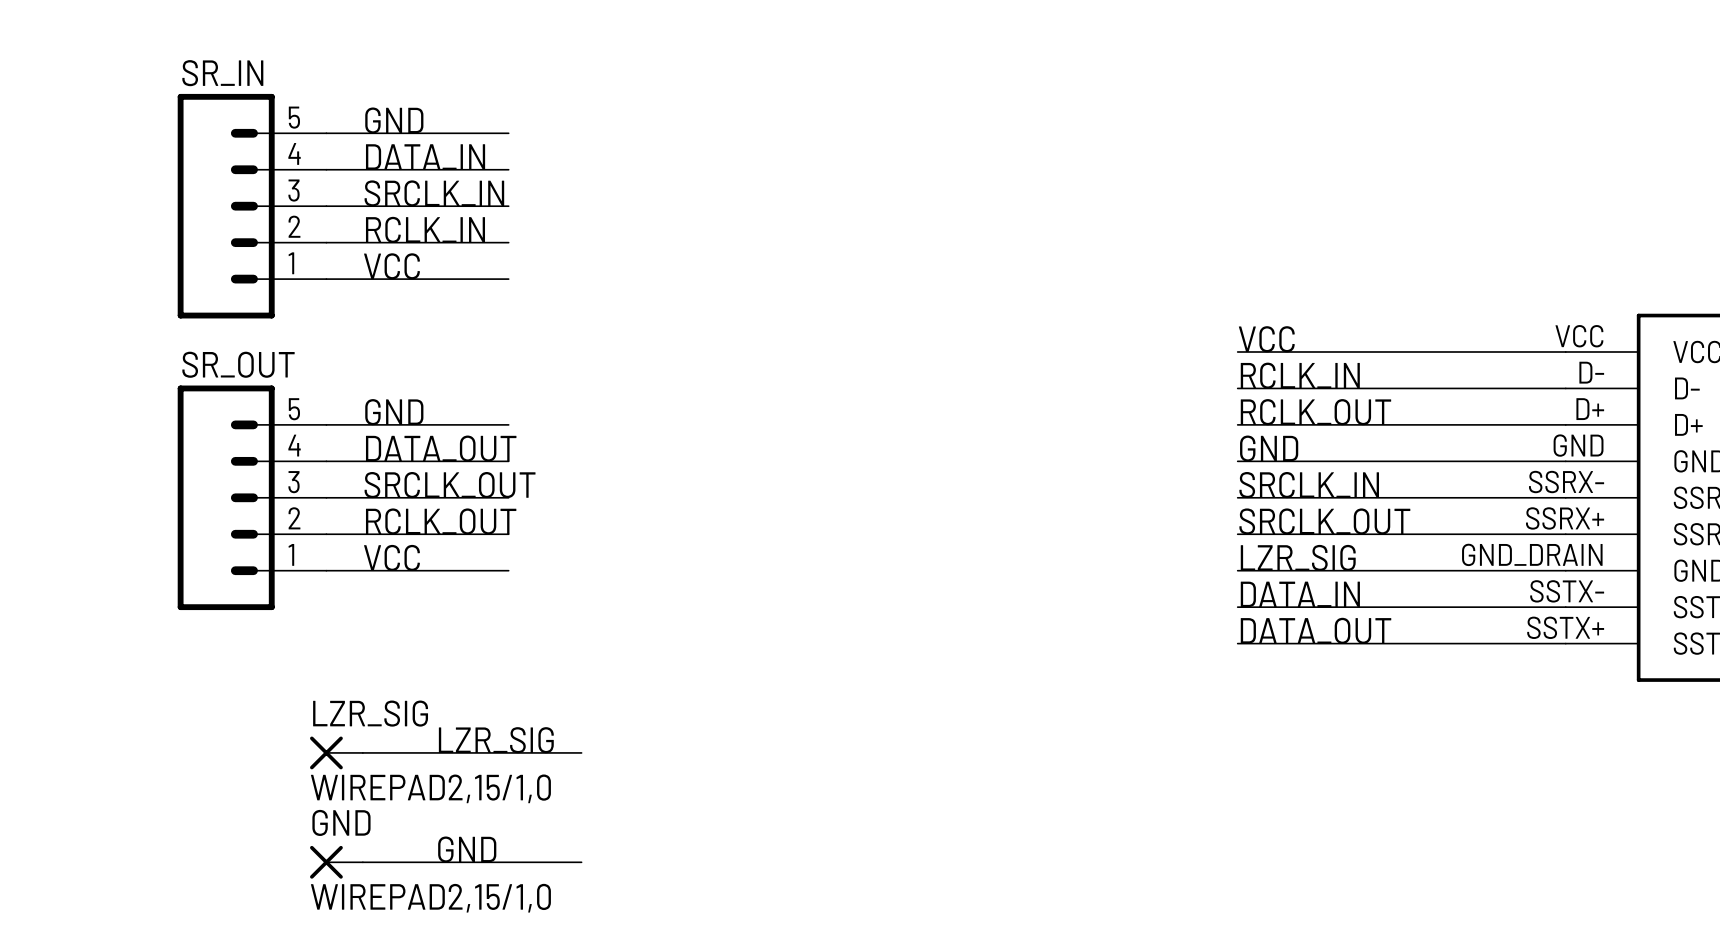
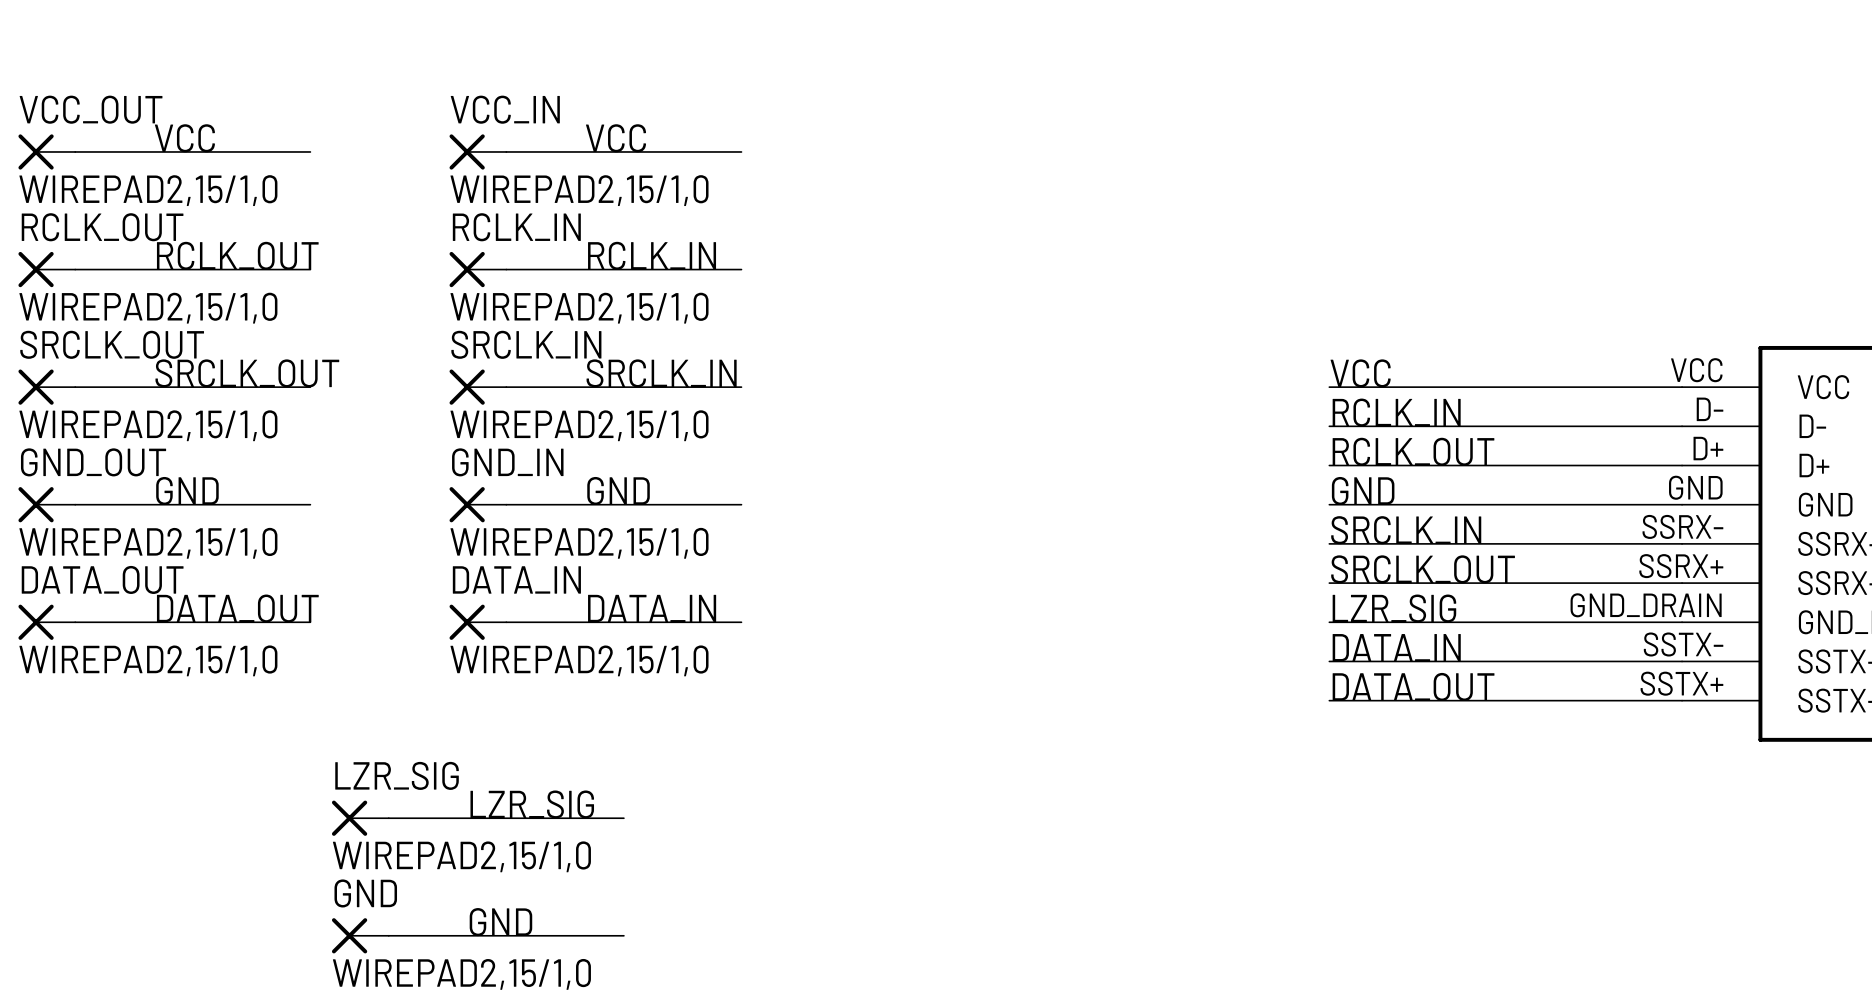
label: none -> VCC (184, 138)
label: GND (394, 120) -> none
label: none -> VCC (615, 138)
VCC_OUT: none -> WIREPAD2,15/1,0 (46, 151)
wire: none -> (75, 151) (310, 151)
wire: (326, 133) (472, 133) -> none
VCC_IN: none -> WIREPAD2,15/1,0 (477, 151)
label: DATA_IN (425, 156) -> none
wire: (326, 169) (508, 169) -> (545, 151) (741, 151)
label position: SRCLK_IN (434, 193) -> SRCLK_IN (661, 373)
SR_IN: (252, 206) -> none
wire: (326, 206) (508, 206) -> none
label: none -> RCLK_OUT (237, 255)
label position: RCLK_IN (425, 229) -> RCLK_IN (652, 255)
RCLK_OUT: none -> WIREPAD2,15/1,0 (46, 269)
wire: none -> (75, 269) (310, 269)
wire: (326, 242) (472, 242) -> none
RCLK_IN: none -> WIREPAD2,15/1,0 (477, 269)
label: VCC (391, 266) -> none
wire: (326, 279) (508, 279) -> (545, 269) (741, 269)
SRCLK_OUT: none -> WIREPAD2,15/1,0 (46, 387)
wire: none -> (75, 387) (310, 387)
SRCLK_IN: none -> WIREPAD2,15/1,0 (477, 387)
wire: none -> (506, 387) (741, 387)
label: GND (394, 412) -> none
wire: (326, 424) (508, 424) -> (545, 504) (741, 504)
label: none -> GND (187, 490)
label position: DATA_OUT (441, 448) -> DATA_OUT (237, 608)
label: none -> GND (618, 490)
GND_OUT: none -> WIREPAD2,15/1,0 (46, 504)
wire: none -> (75, 504) (310, 504)
wire: (326, 461) (472, 461) -> none
GND_IN: none -> WIREPAD2,15/1,0 (477, 504)
label position: SRCLK_OUT (450, 485) -> SRCLK_OUT (247, 373)
SR_OUT: (252, 497) -> none
wire: (326, 497) (508, 497) -> none
label: RCLK_OUT (441, 521) -> none
wire: (326, 534) (508, 534) -> (545, 622) (741, 622)
label: VCC (391, 557) -> none
label: none -> DATA_IN (652, 608)
DATA_OUT: none -> WIREPAD2,15/1,0 (46, 622)
wire: none -> (75, 622) (310, 622)
wire: (326, 570) (472, 570) -> none
DATA_IN: none -> WIREPAD2,15/1,0 (477, 622)

